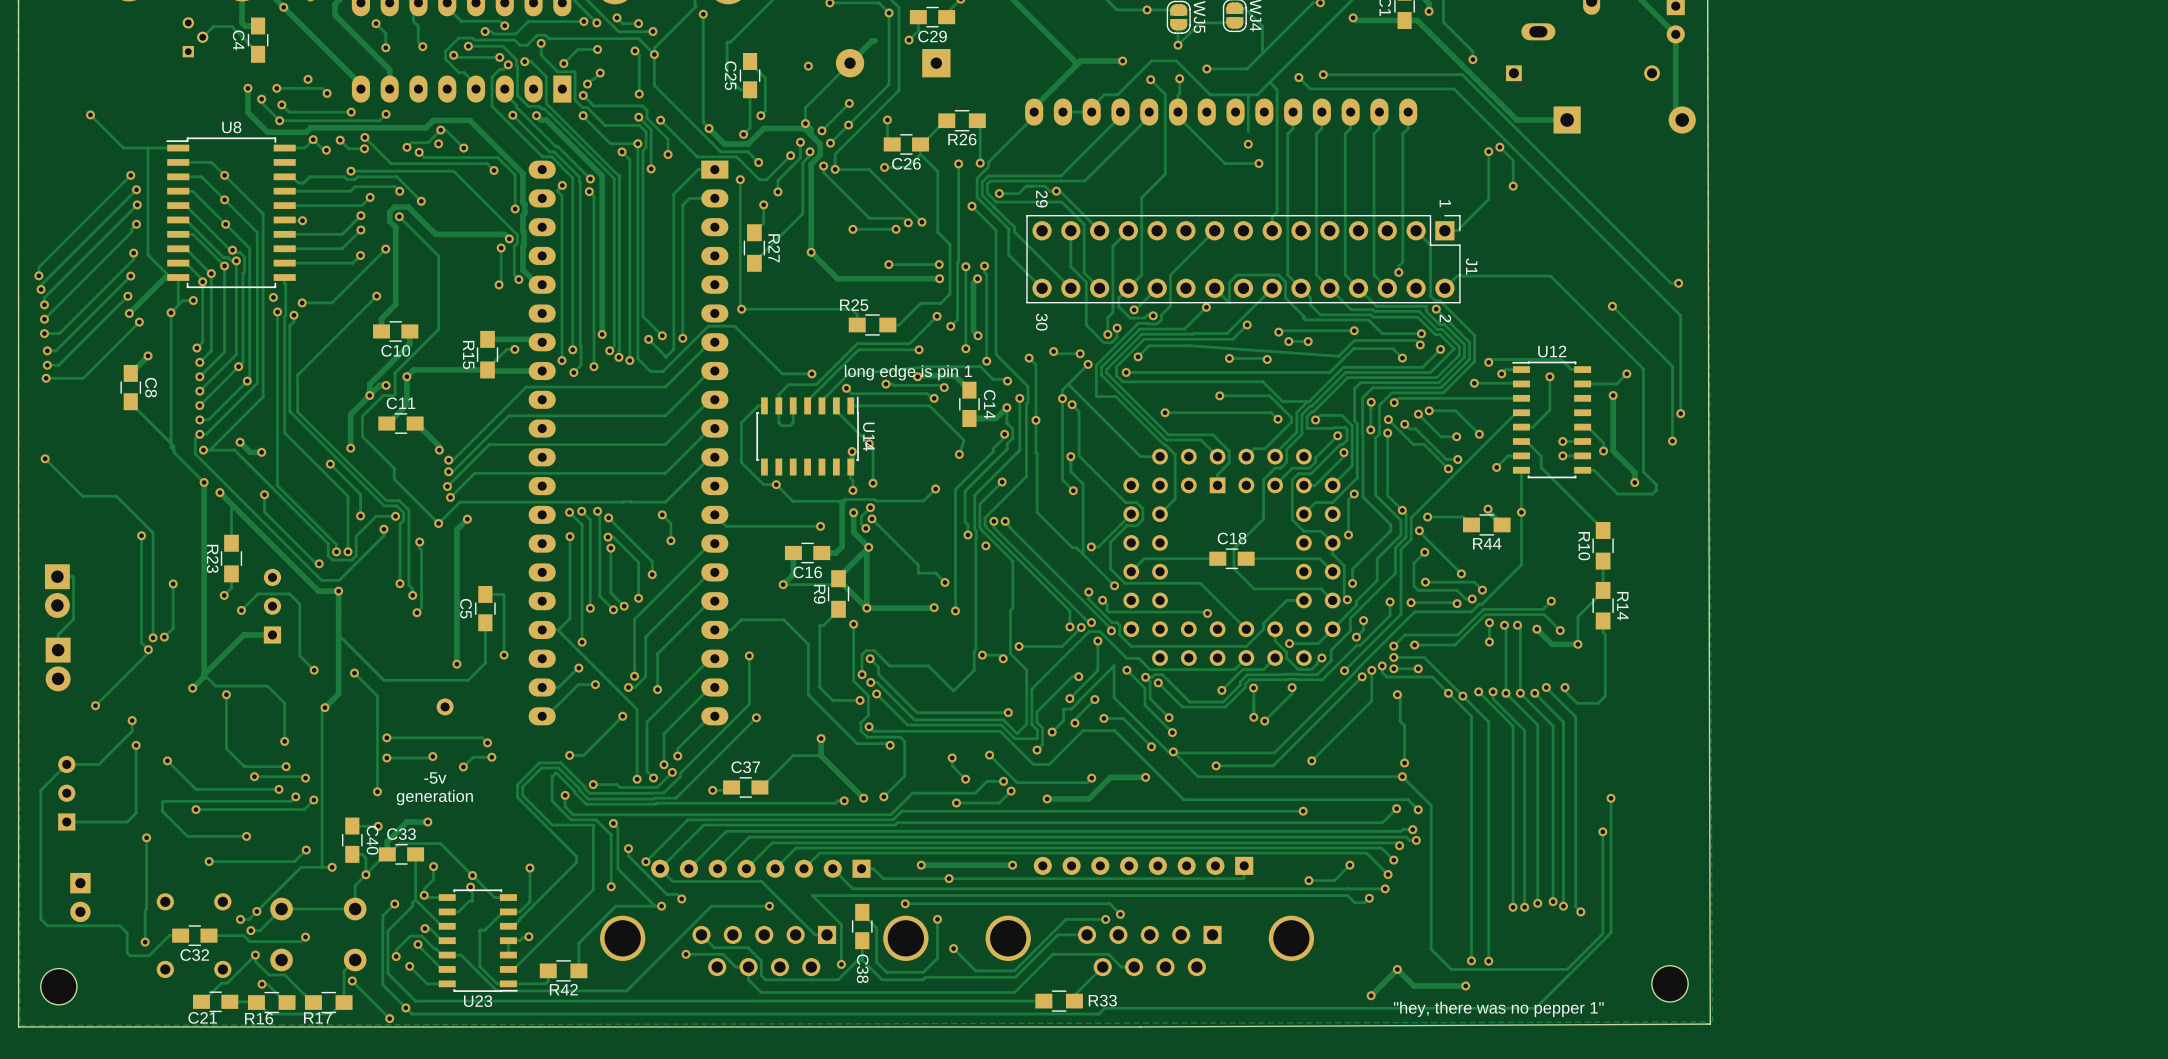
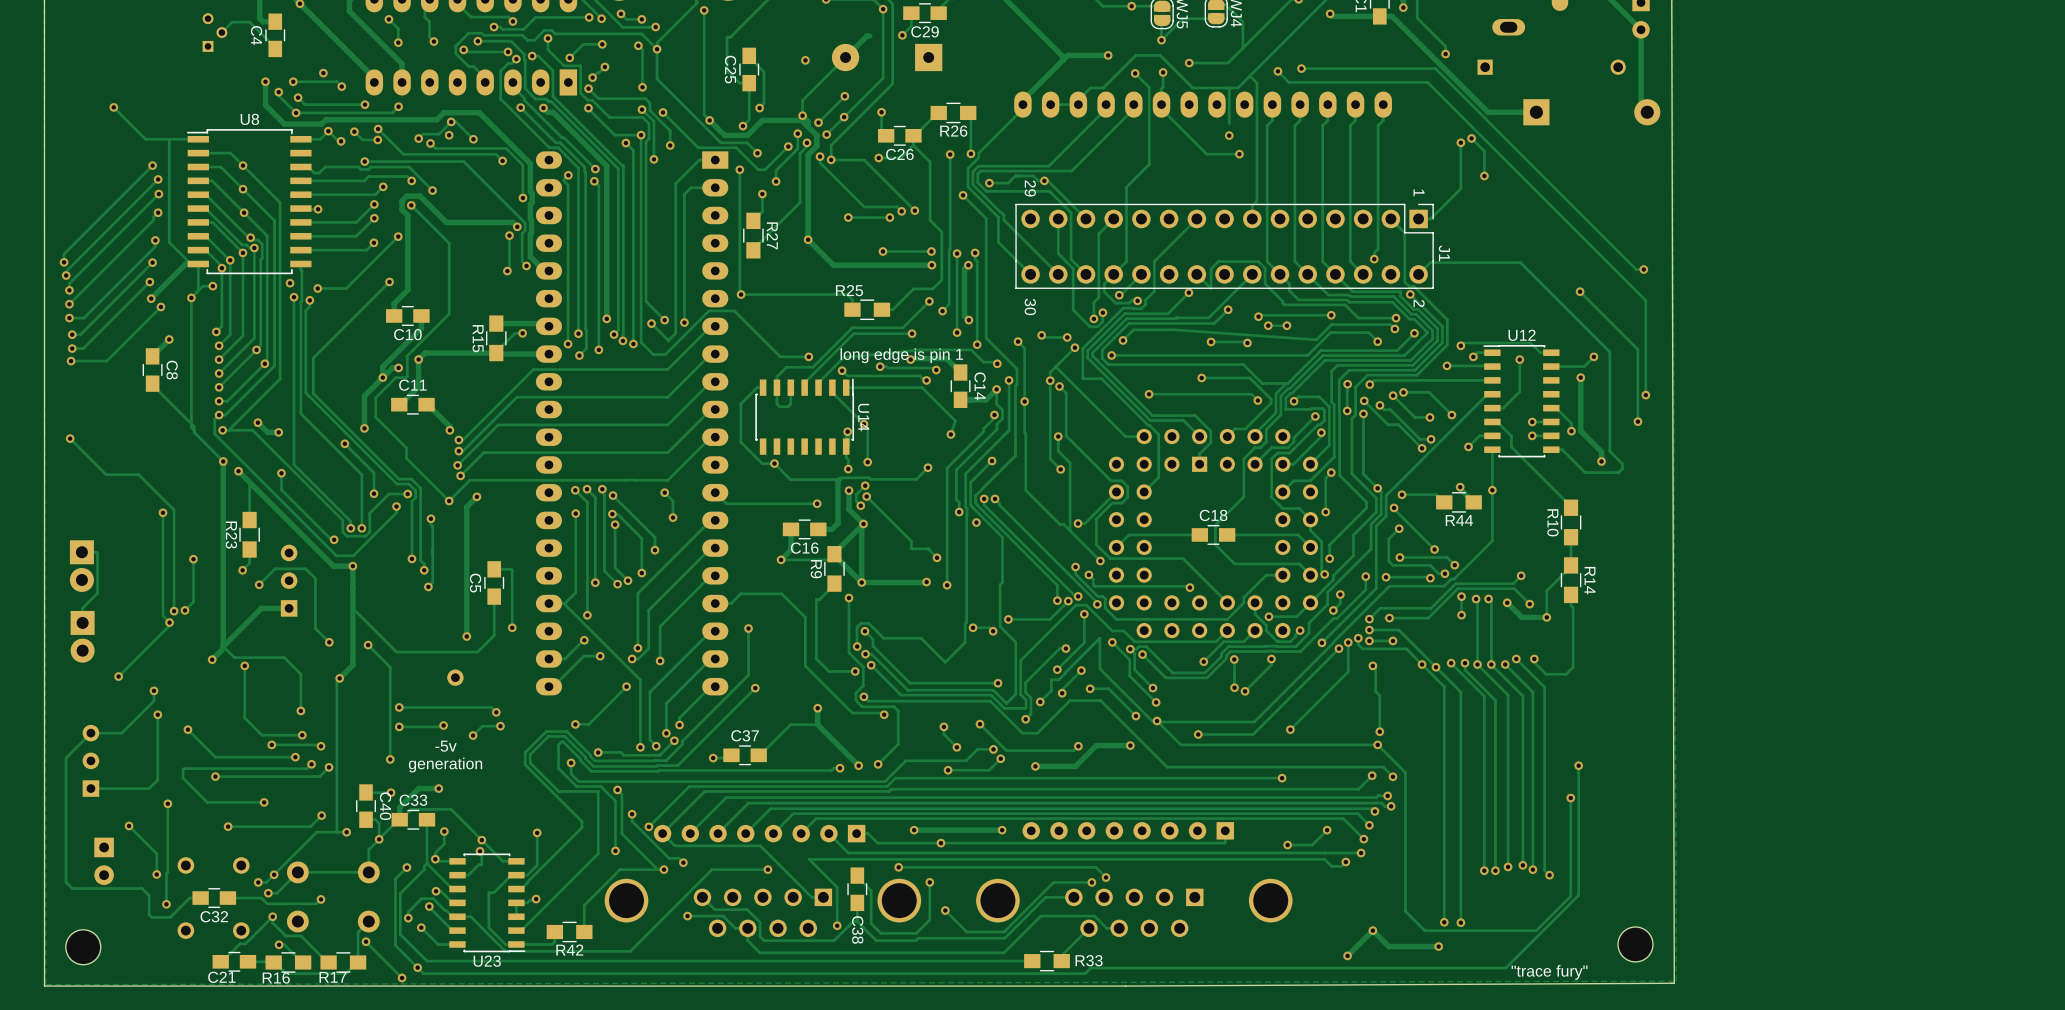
track: none -> (129, 825) (156, 853) (156, 874)
via: none -> (129, 825)
via: none -> (156, 874)
text: "hey, there was no pepper 1" (1498, 1009) -> none
text: none -> "trace fury" (1549, 972)

